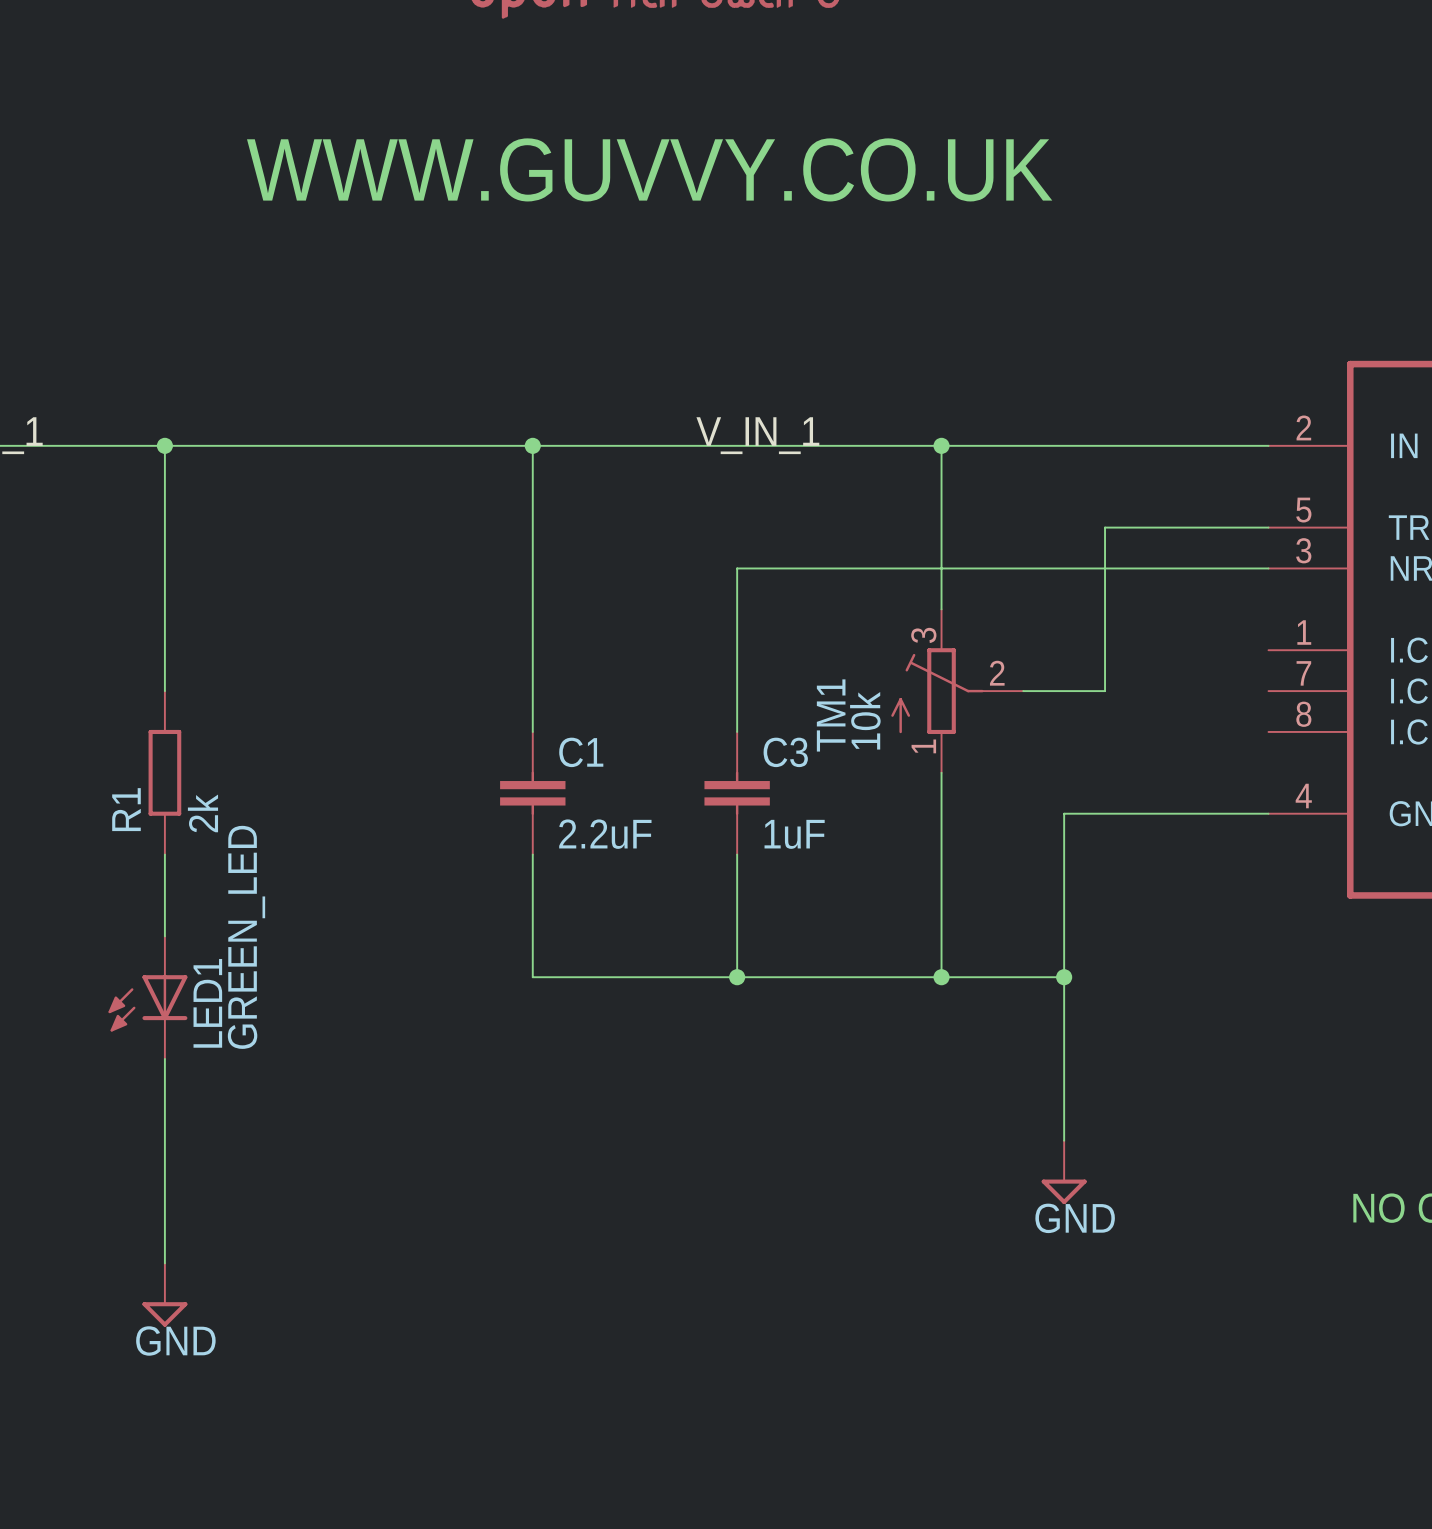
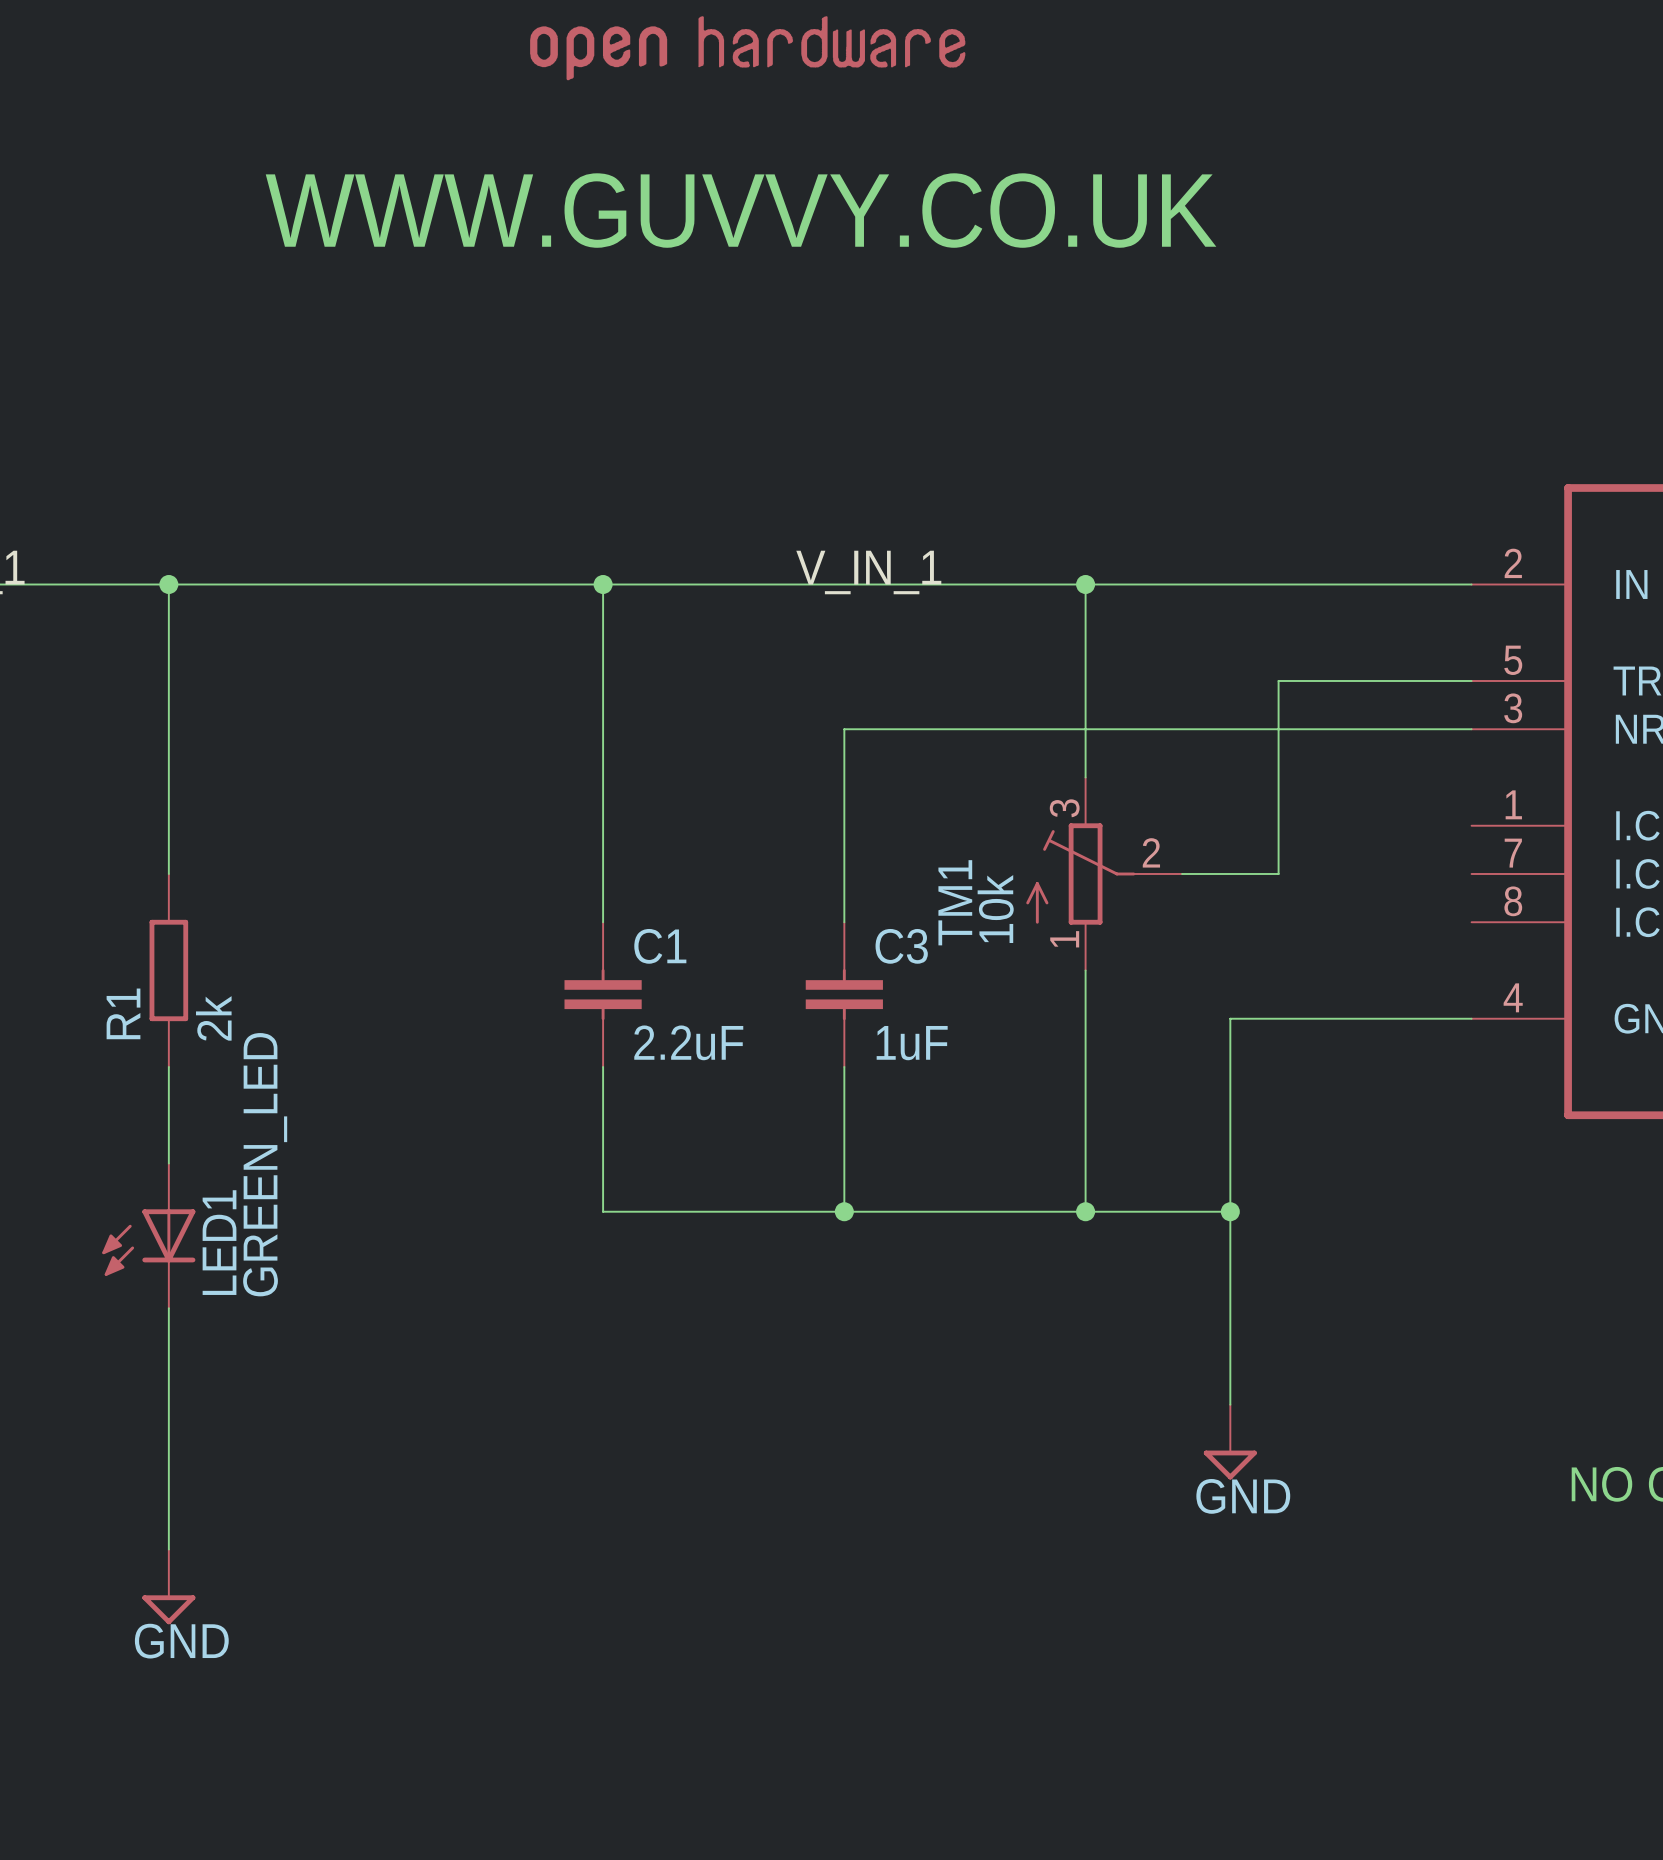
text position: WWW.GUVVY.CO.UK (649, 169) -> WWW.GUVVY.CO.UK (741, 210)

